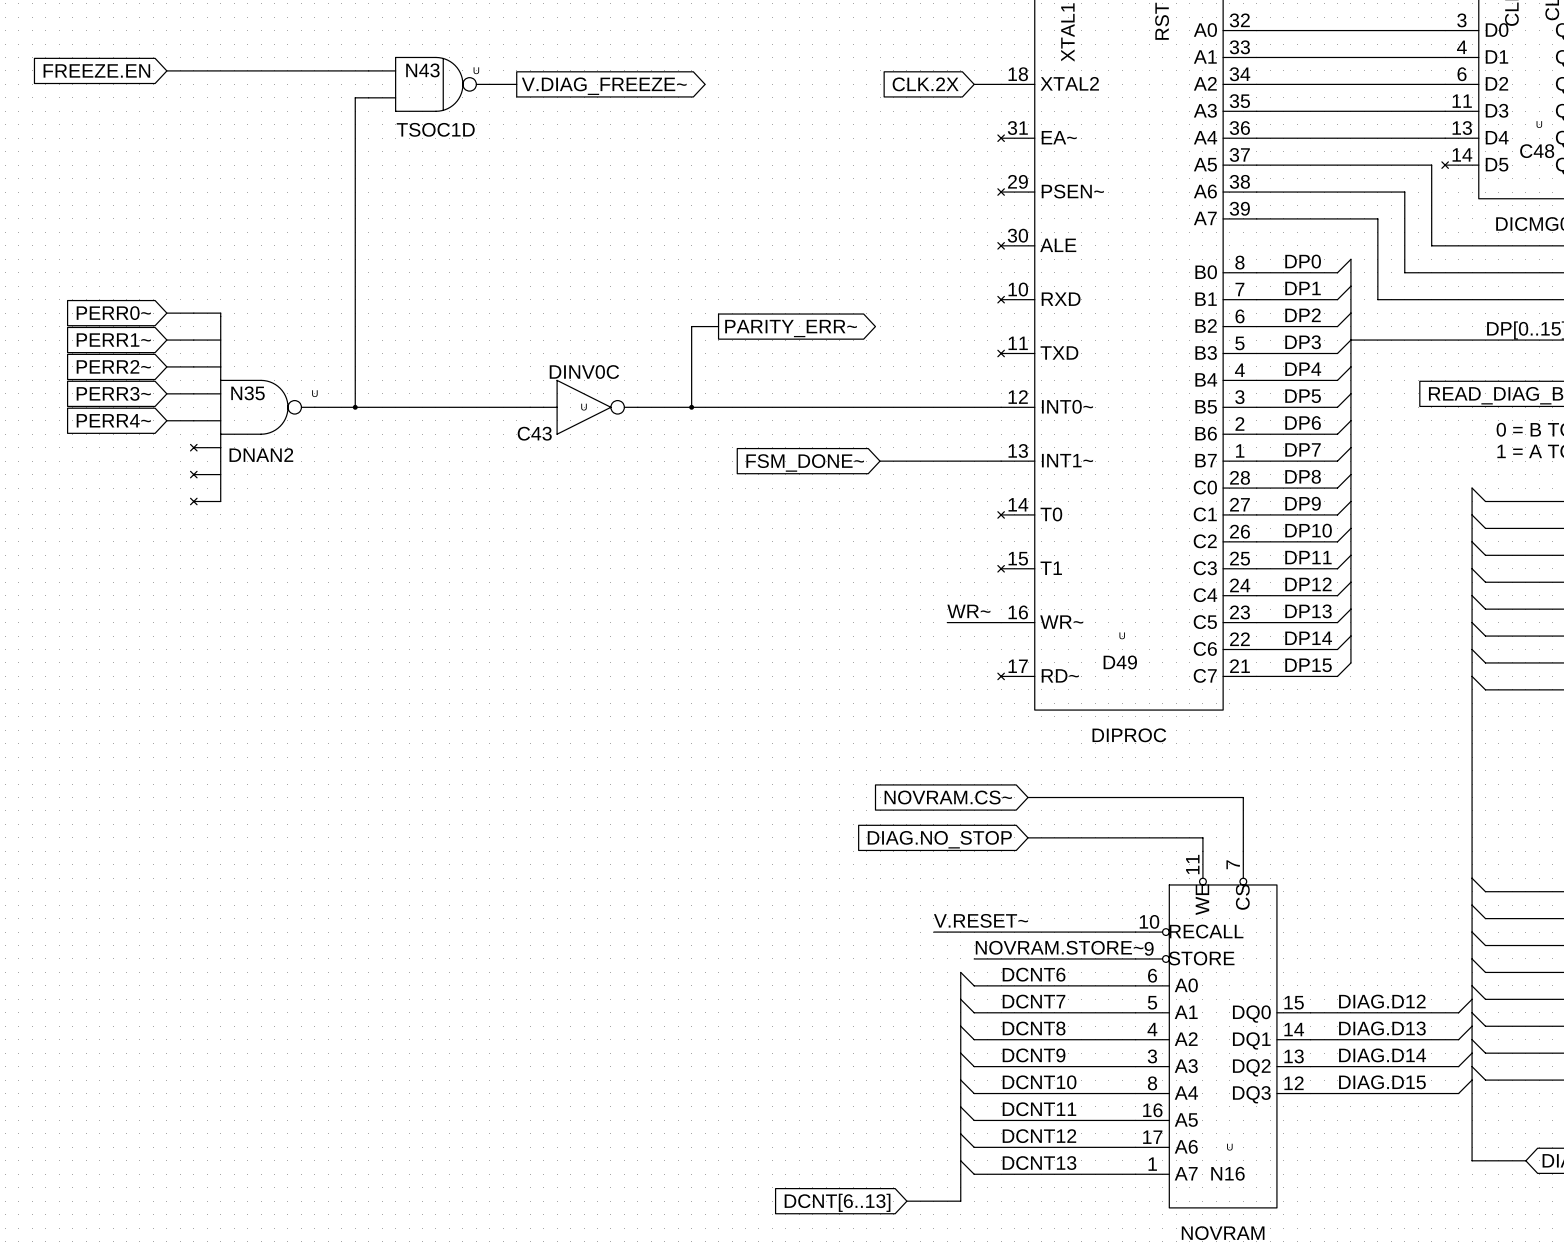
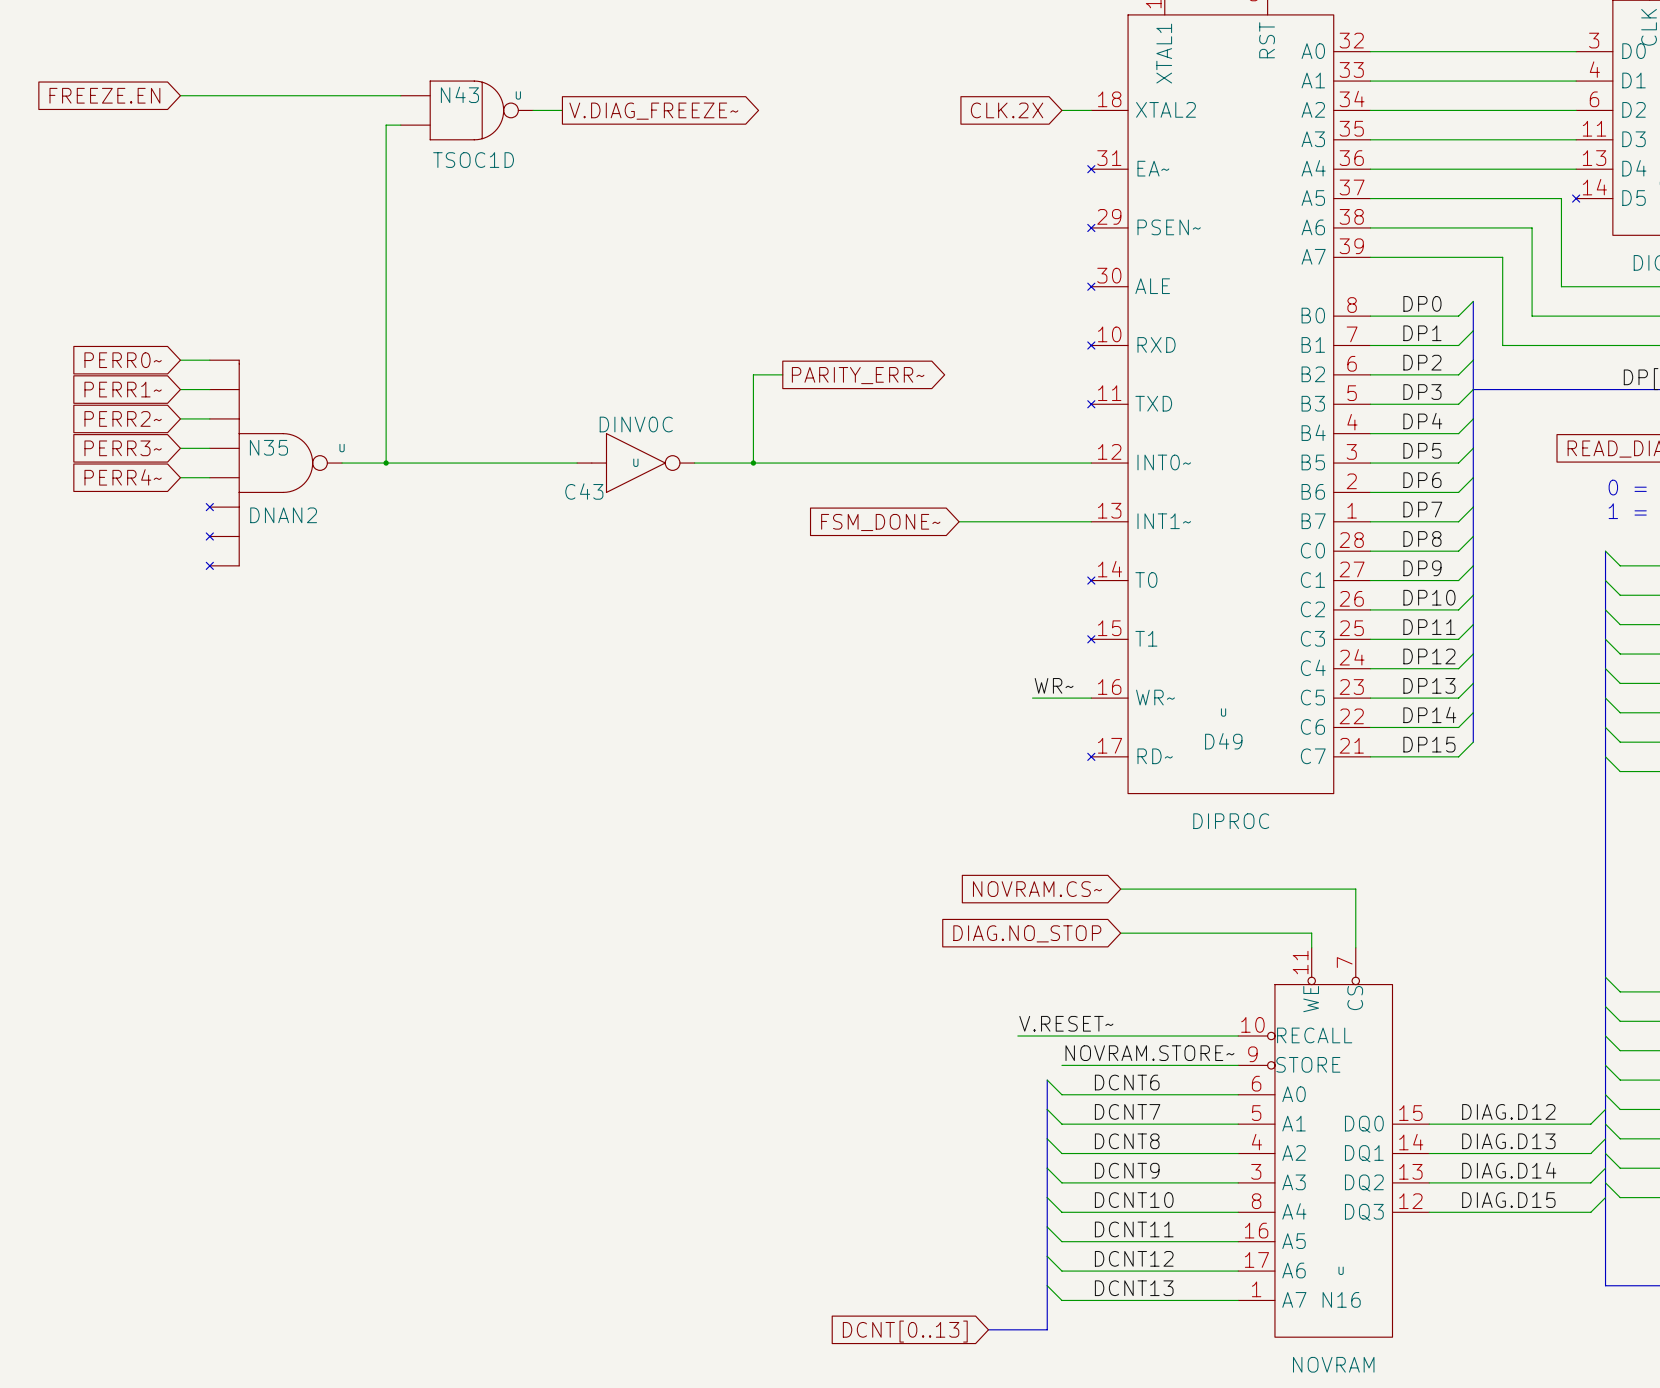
global label: DCNT[6..13] (837, 1202) -> DCNT[0..13] (905, 1331)

